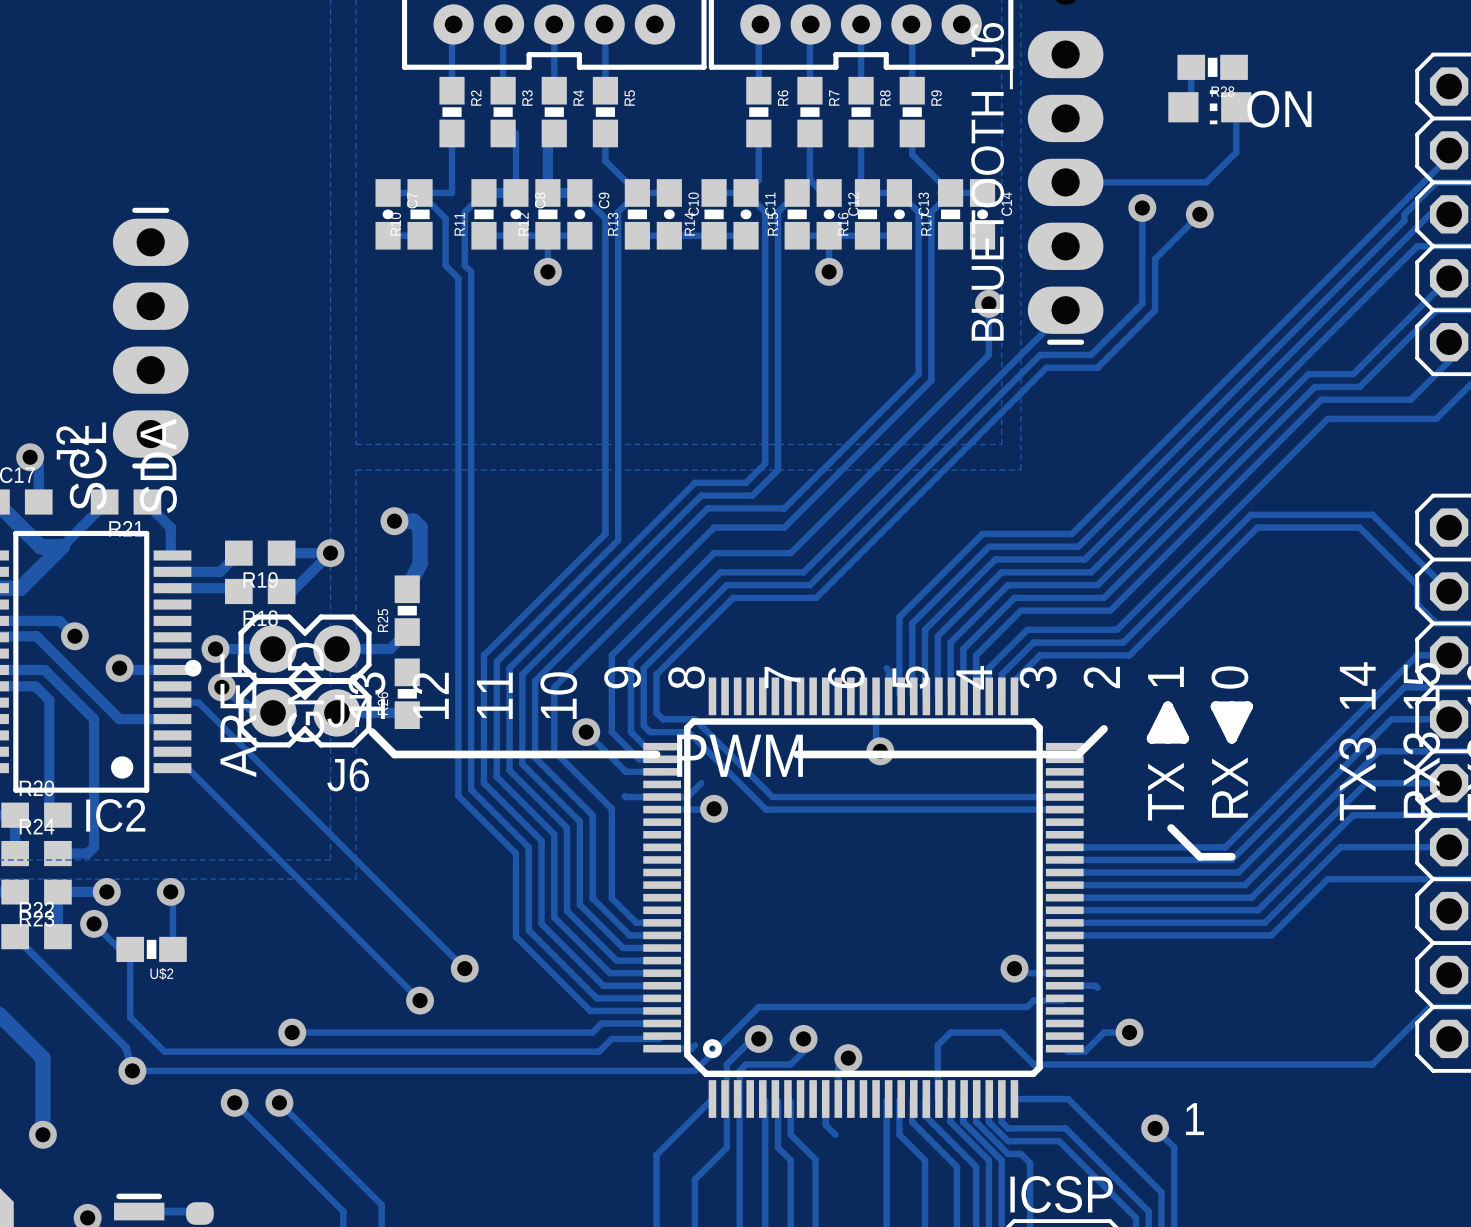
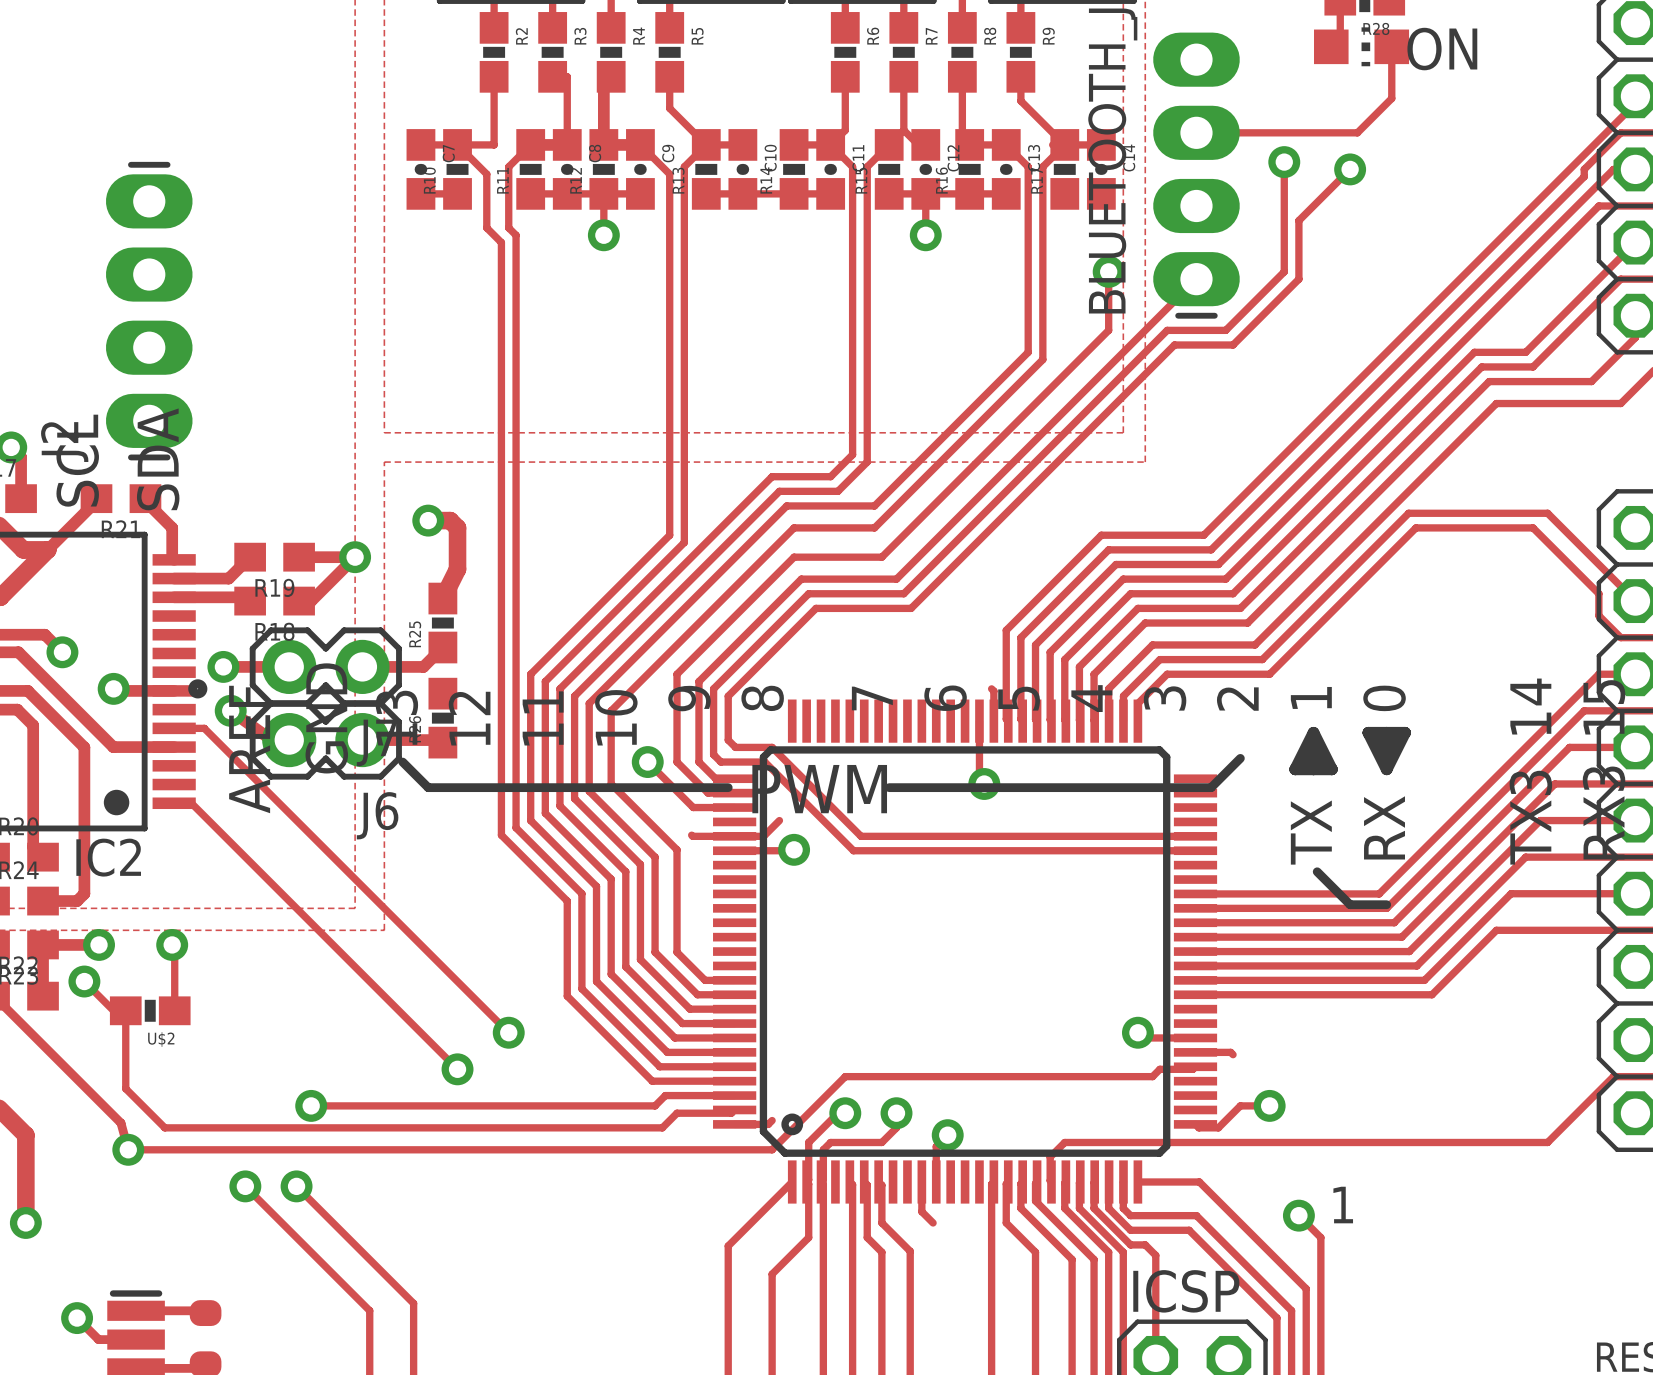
track: (1033, 1064) (1001, 1032) (950, 1032) (937, 1045) (937, 1077) -> (1159, 1142) (1064, 1142) (1050, 1157)

